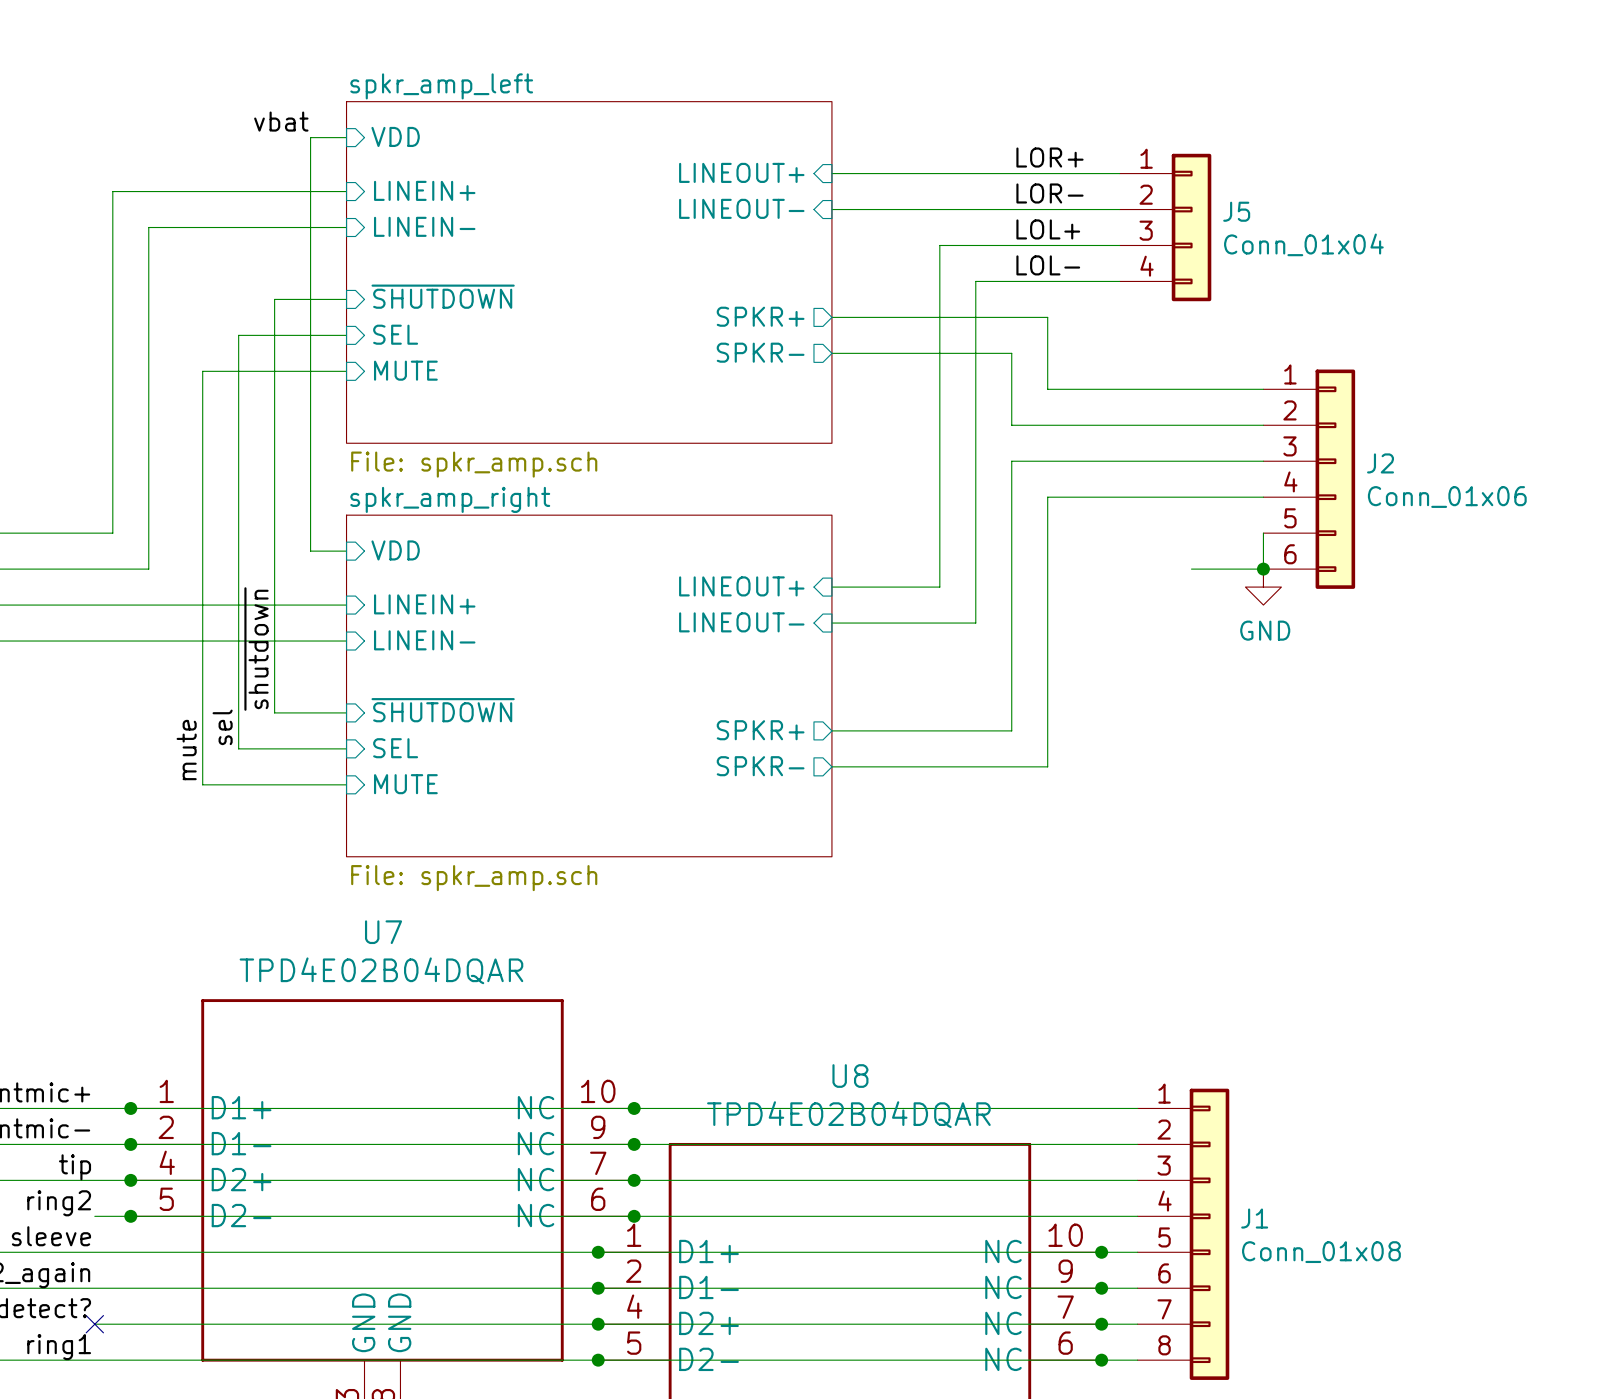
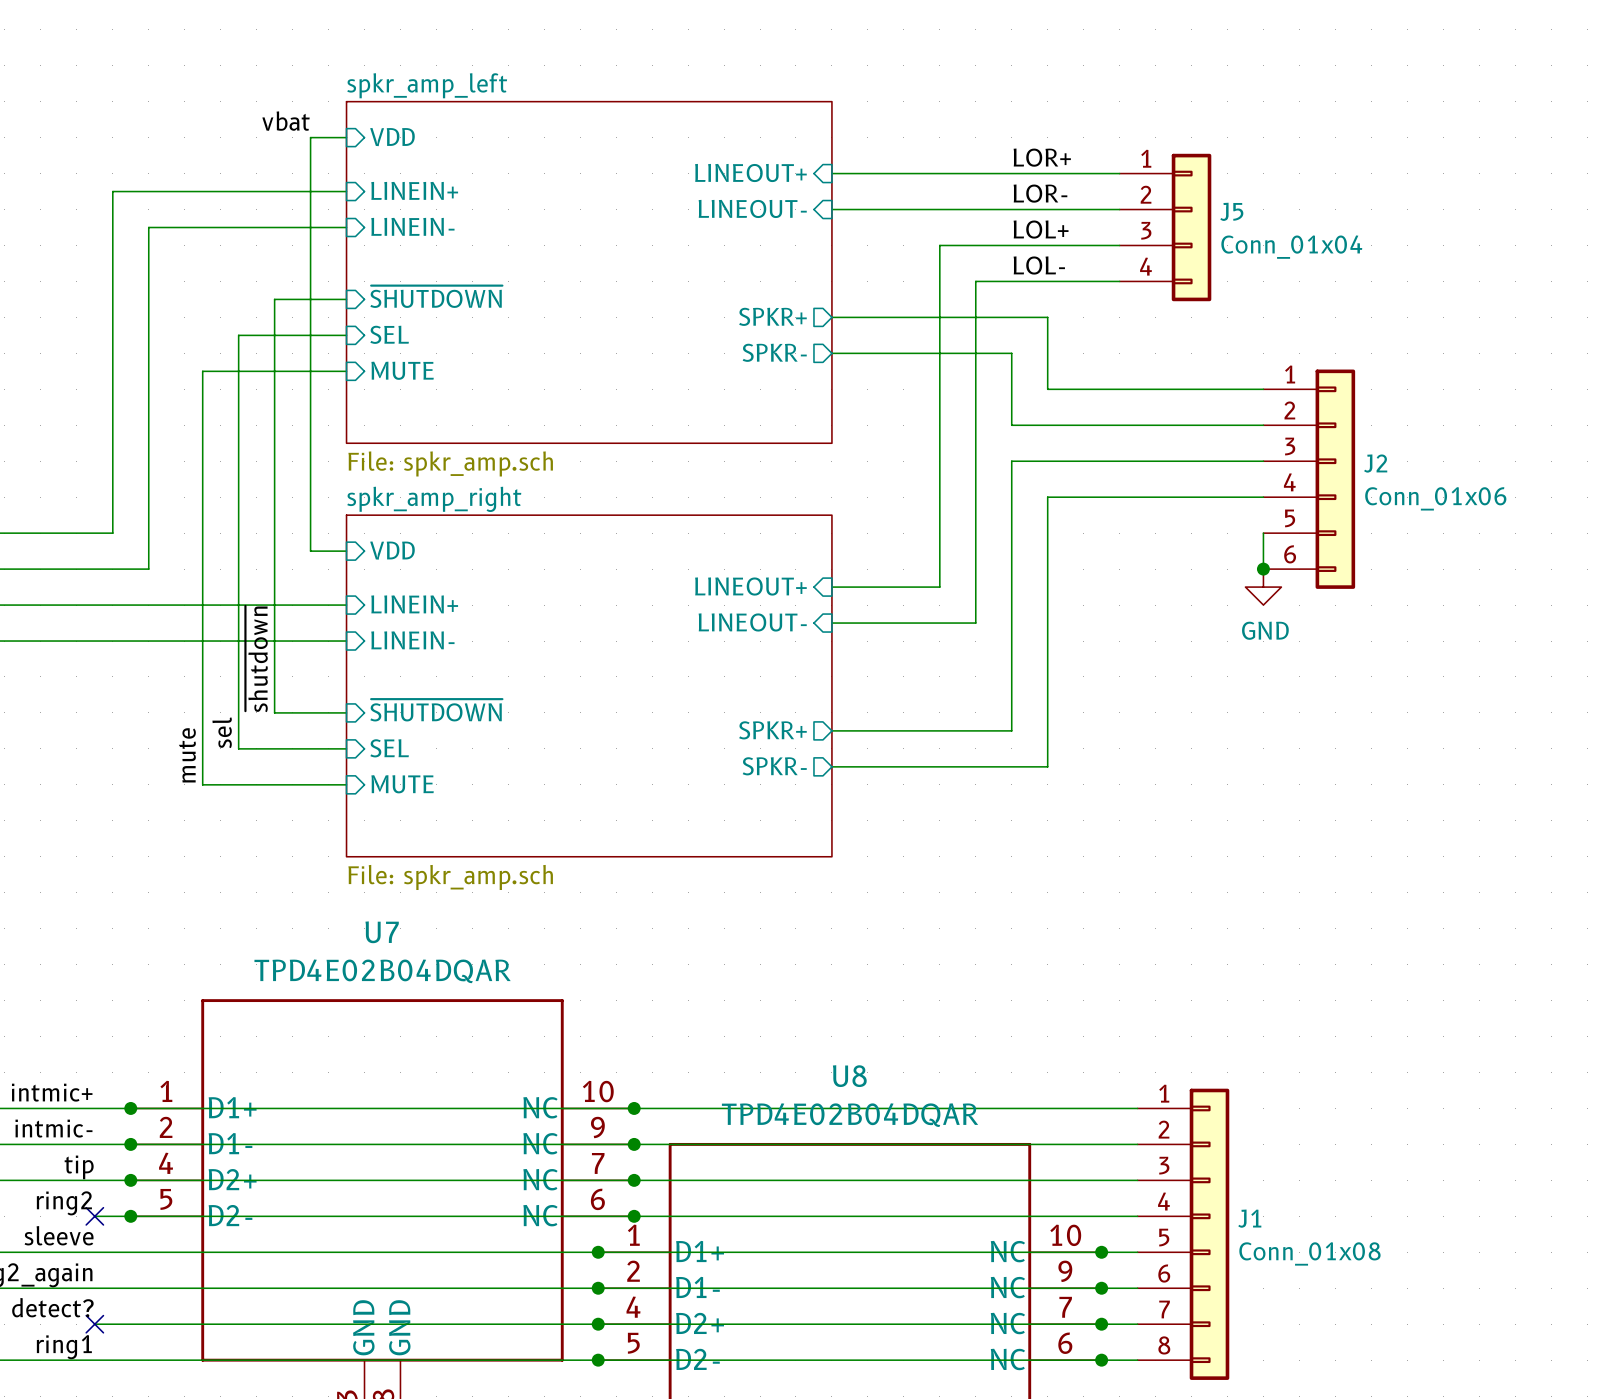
wire: (1191, 569) (1263, 569) -> none
no-connect mark: none -> (94, 1216)

